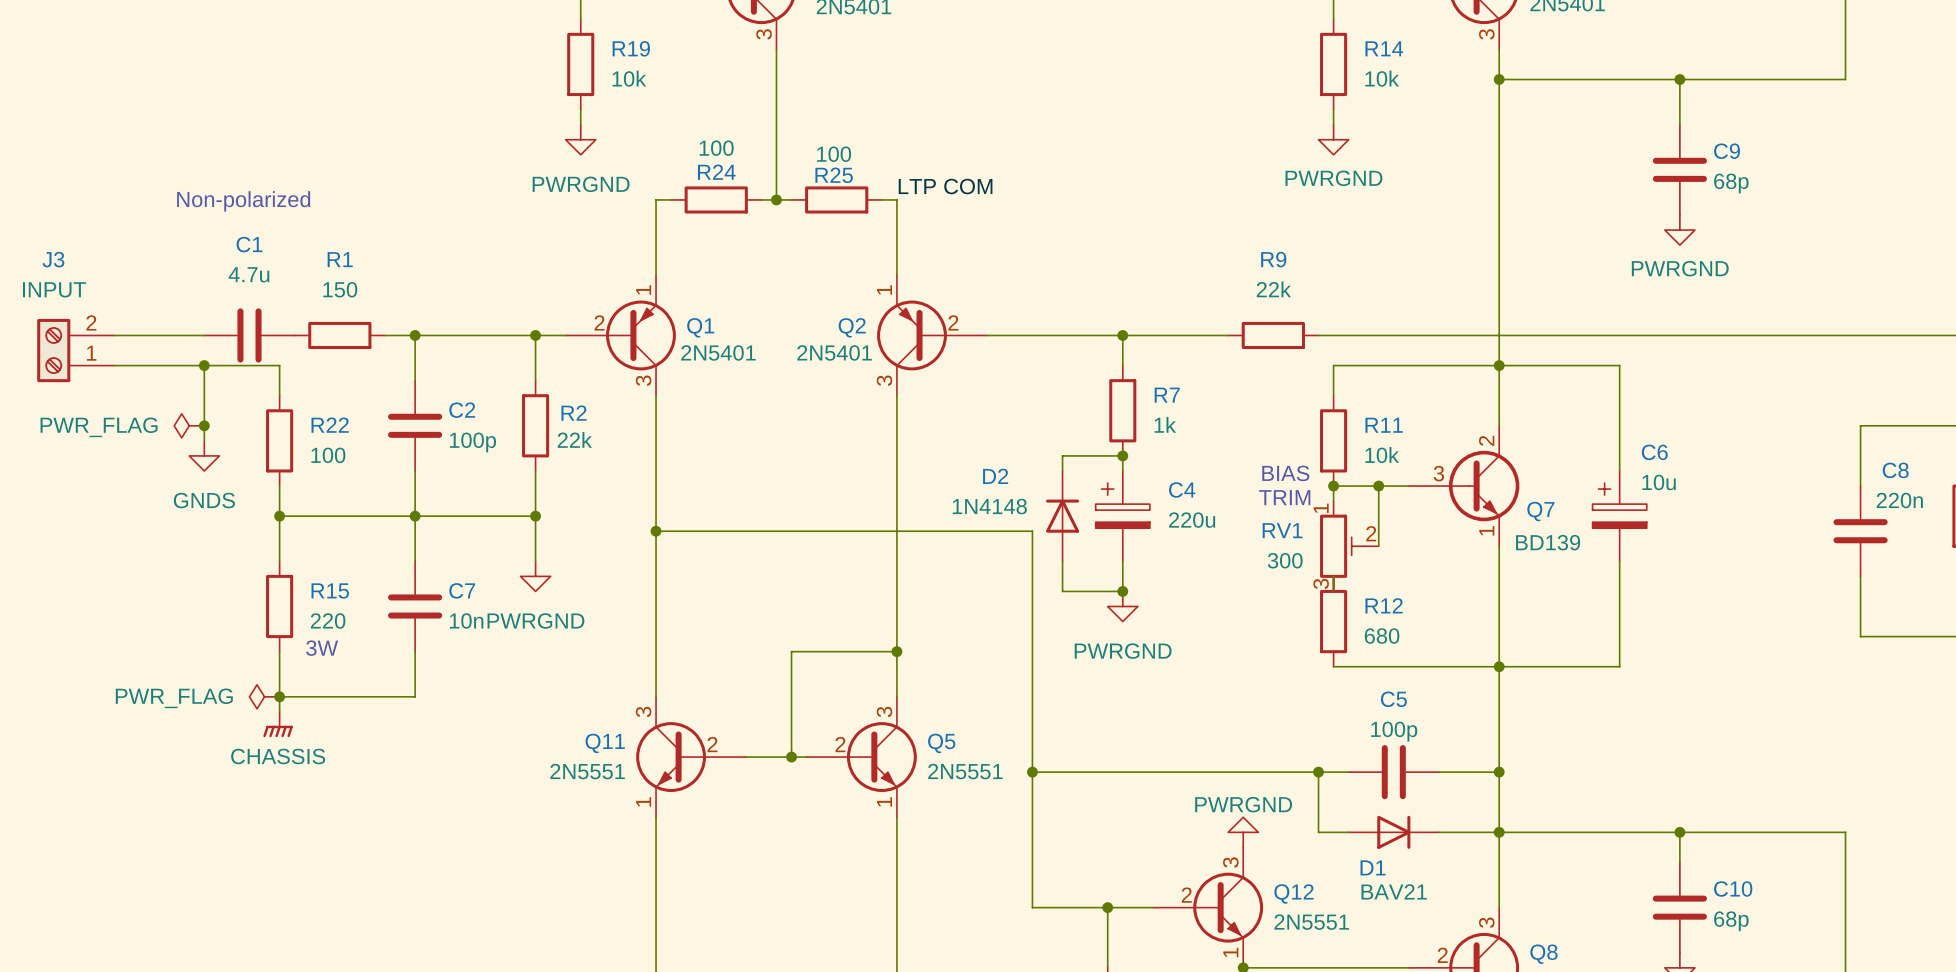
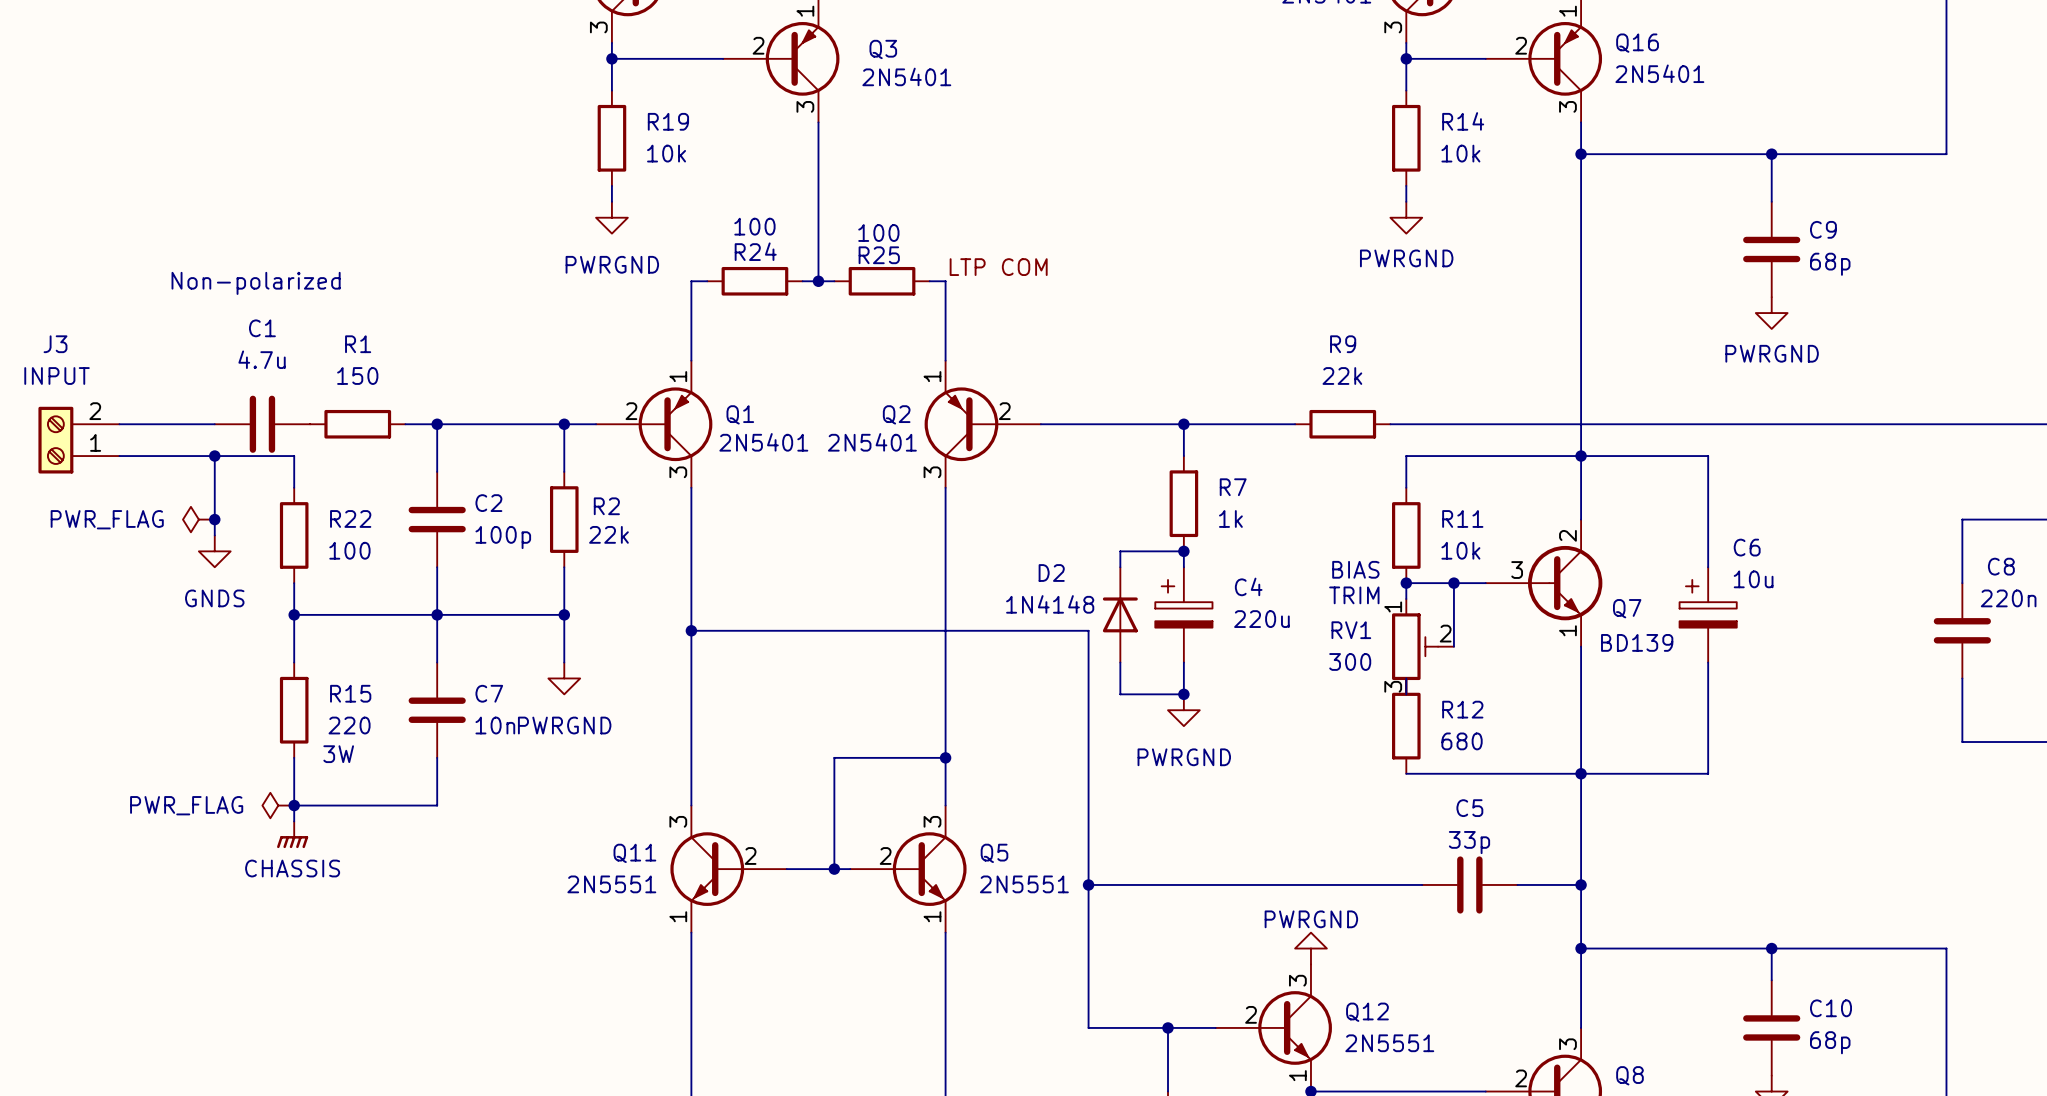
C5 value: 100p (1394, 731) -> 33p (1469, 842)
wire: (1318, 772) (1318, 832) (1348, 832) -> none
junction: (1318, 772) -> none
D1: BAV21 (1393, 832) -> none
wire: (1438, 832) (1499, 832) -> none

